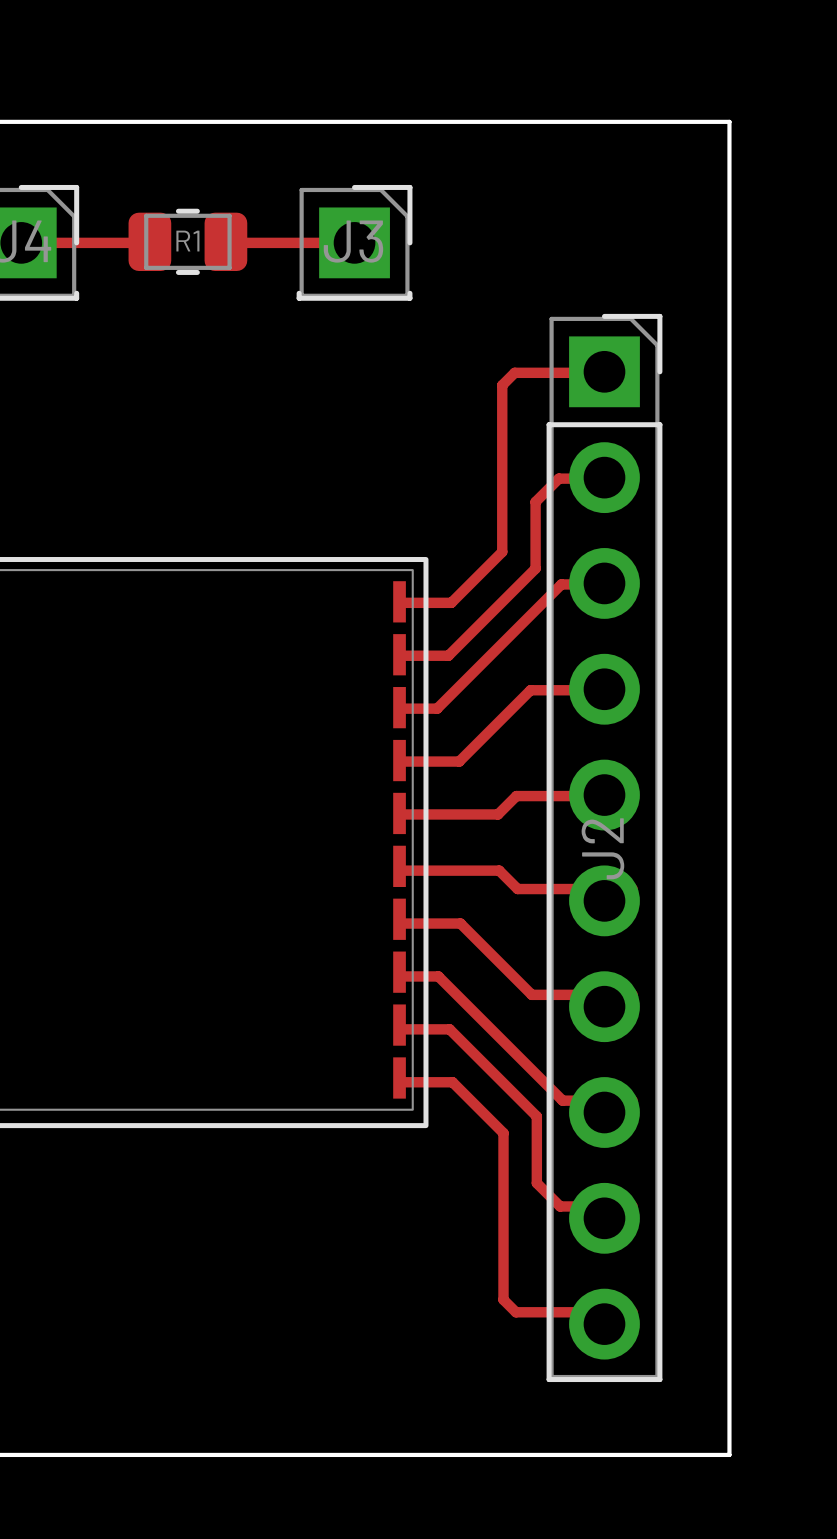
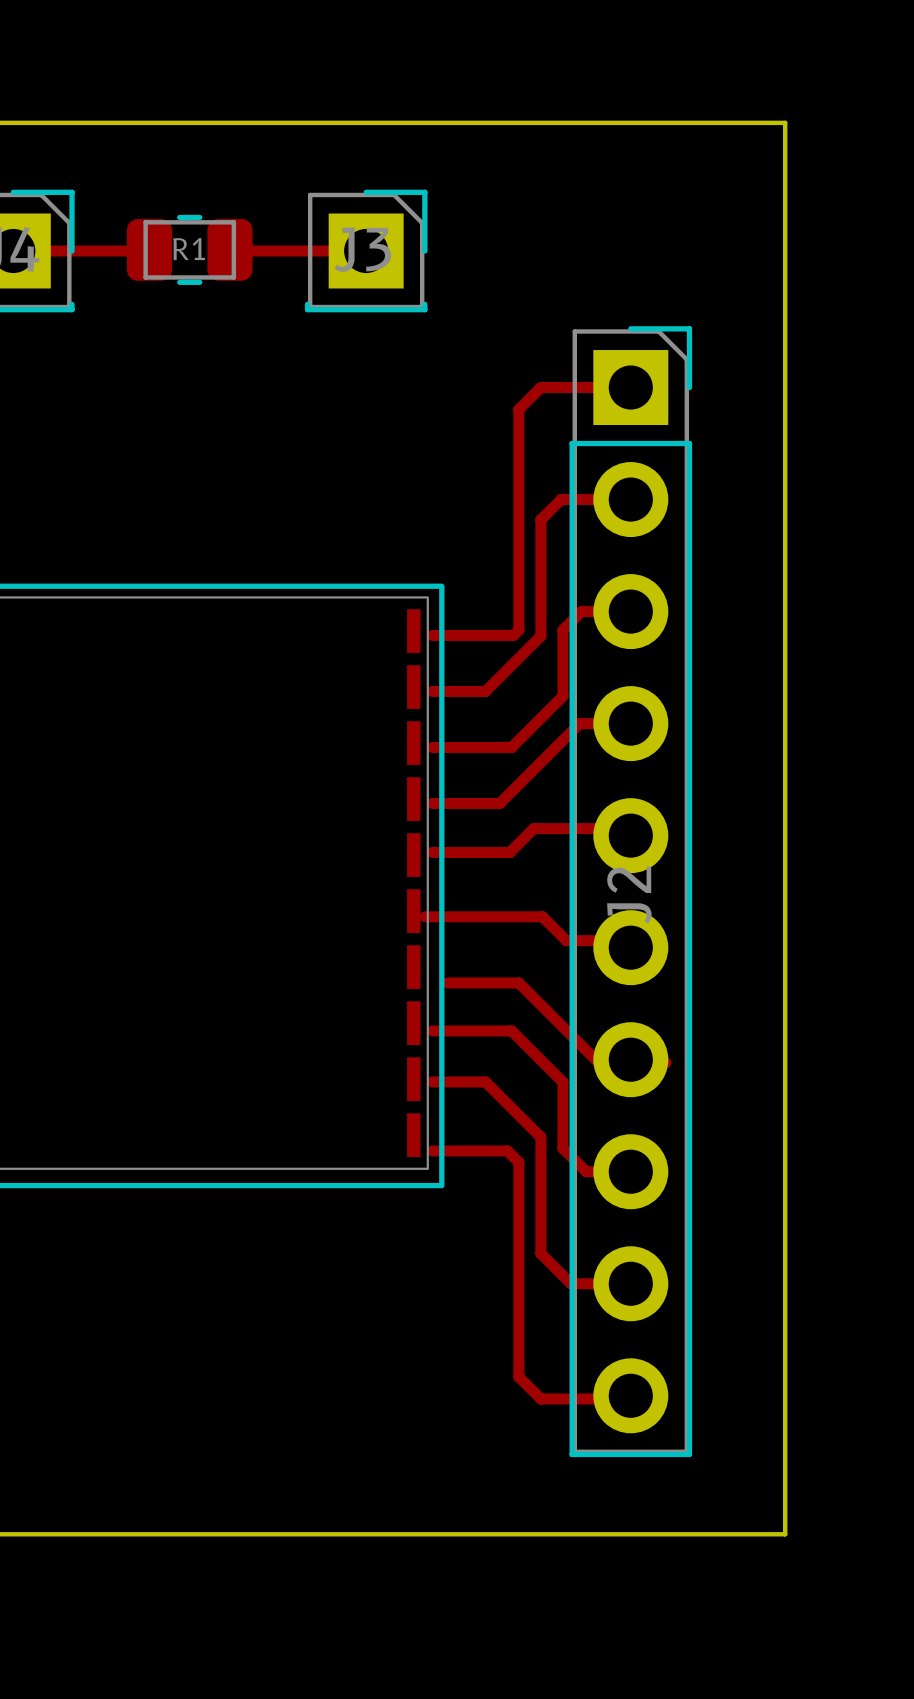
board edge: (729, 121) (729, 1454) -> (763, 122) (785, 122) (785, 1534) (763, 1534)
top track: none -> (651, 387) (540, 387) (518, 409) (518, 630) (513, 635) (432, 635)
top track: (631, 372) (514, 372) (502, 385) (502, 551) (451, 602) (401, 602) -> none
top track: none -> (651, 499) (561, 499) (540, 519) (540, 636) (485, 691) (432, 691)
top track: (631, 478) (558, 478) (535, 501) (535, 568) (448, 655) (401, 655) -> none
top track: none -> (651, 611) (581, 611) (562, 630) (562, 696) (511, 747) (432, 747)
top track: (631, 584) (561, 584) (437, 708) (401, 708) -> none
top track: none -> (651, 723) (579, 723) (499, 803) (432, 803)
top track: (631, 690) (530, 690) (459, 761) (401, 761) -> none
top track: none -> (652, 835) (645, 828) (533, 828) (509, 852) (432, 852)
top track: (631, 796) (516, 796) (498, 814) (401, 814) -> none
top track: (402, 870) (499, 870) (517, 889) (632, 889) -> none
top track: none -> (425, 916) (542, 916) (566, 940) (643, 940)
top track: (402, 923) (460, 923) (531, 994) (632, 994) -> none
top track: none -> (447, 982) (518, 982) (598, 1062) (666, 1062)
top track: (402, 976) (438, 976) (562, 1100) (632, 1100) -> none
top track: none -> (432, 1030) (511, 1030) (562, 1082) (562, 1148) (586, 1171) (652, 1171)
top track: none -> (432, 1081) (485, 1081) (540, 1137) (540, 1253) (571, 1283) (652, 1283)
top track: (402, 1029) (449, 1029) (536, 1116) (536, 1183) (560, 1206) (632, 1206) -> none
top track: (402, 1082) (452, 1082) (503, 1133) (503, 1299) (516, 1312) (632, 1312) -> none
top track: none -> (432, 1151) (507, 1151) (518, 1162) (518, 1376) (540, 1398) (651, 1398)

